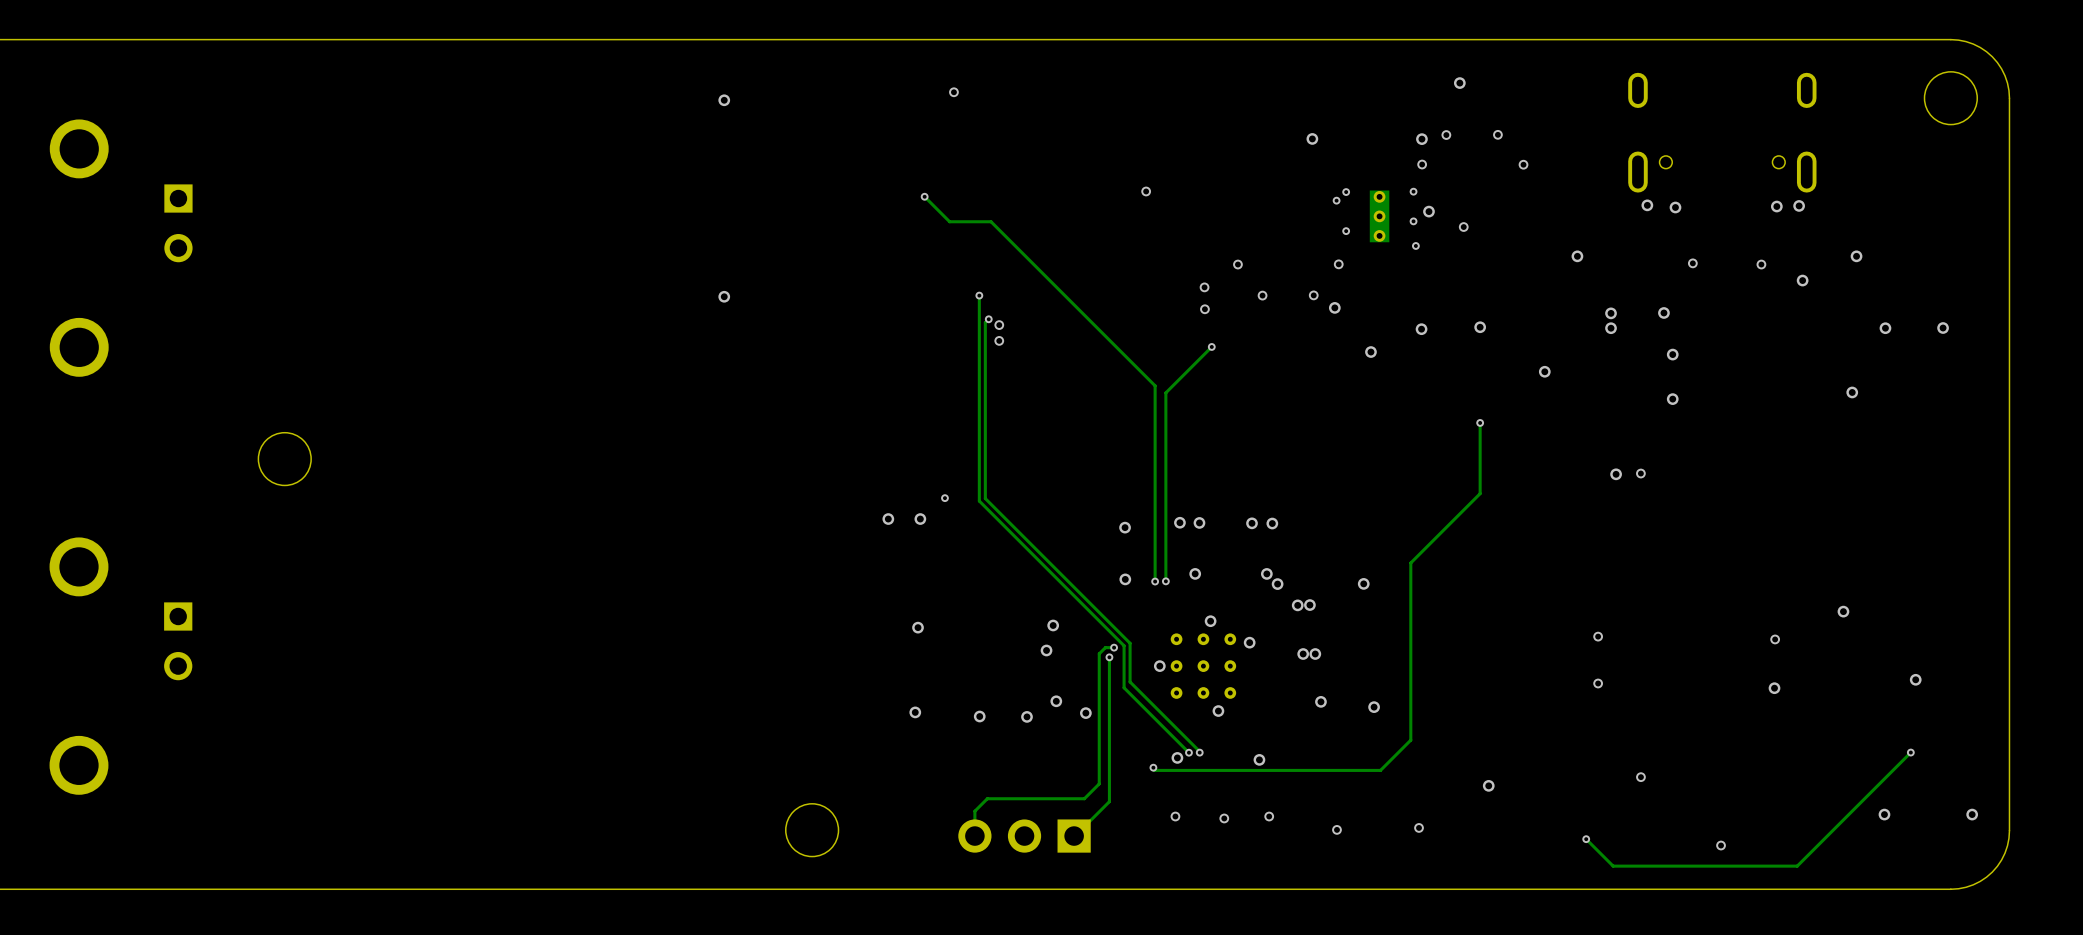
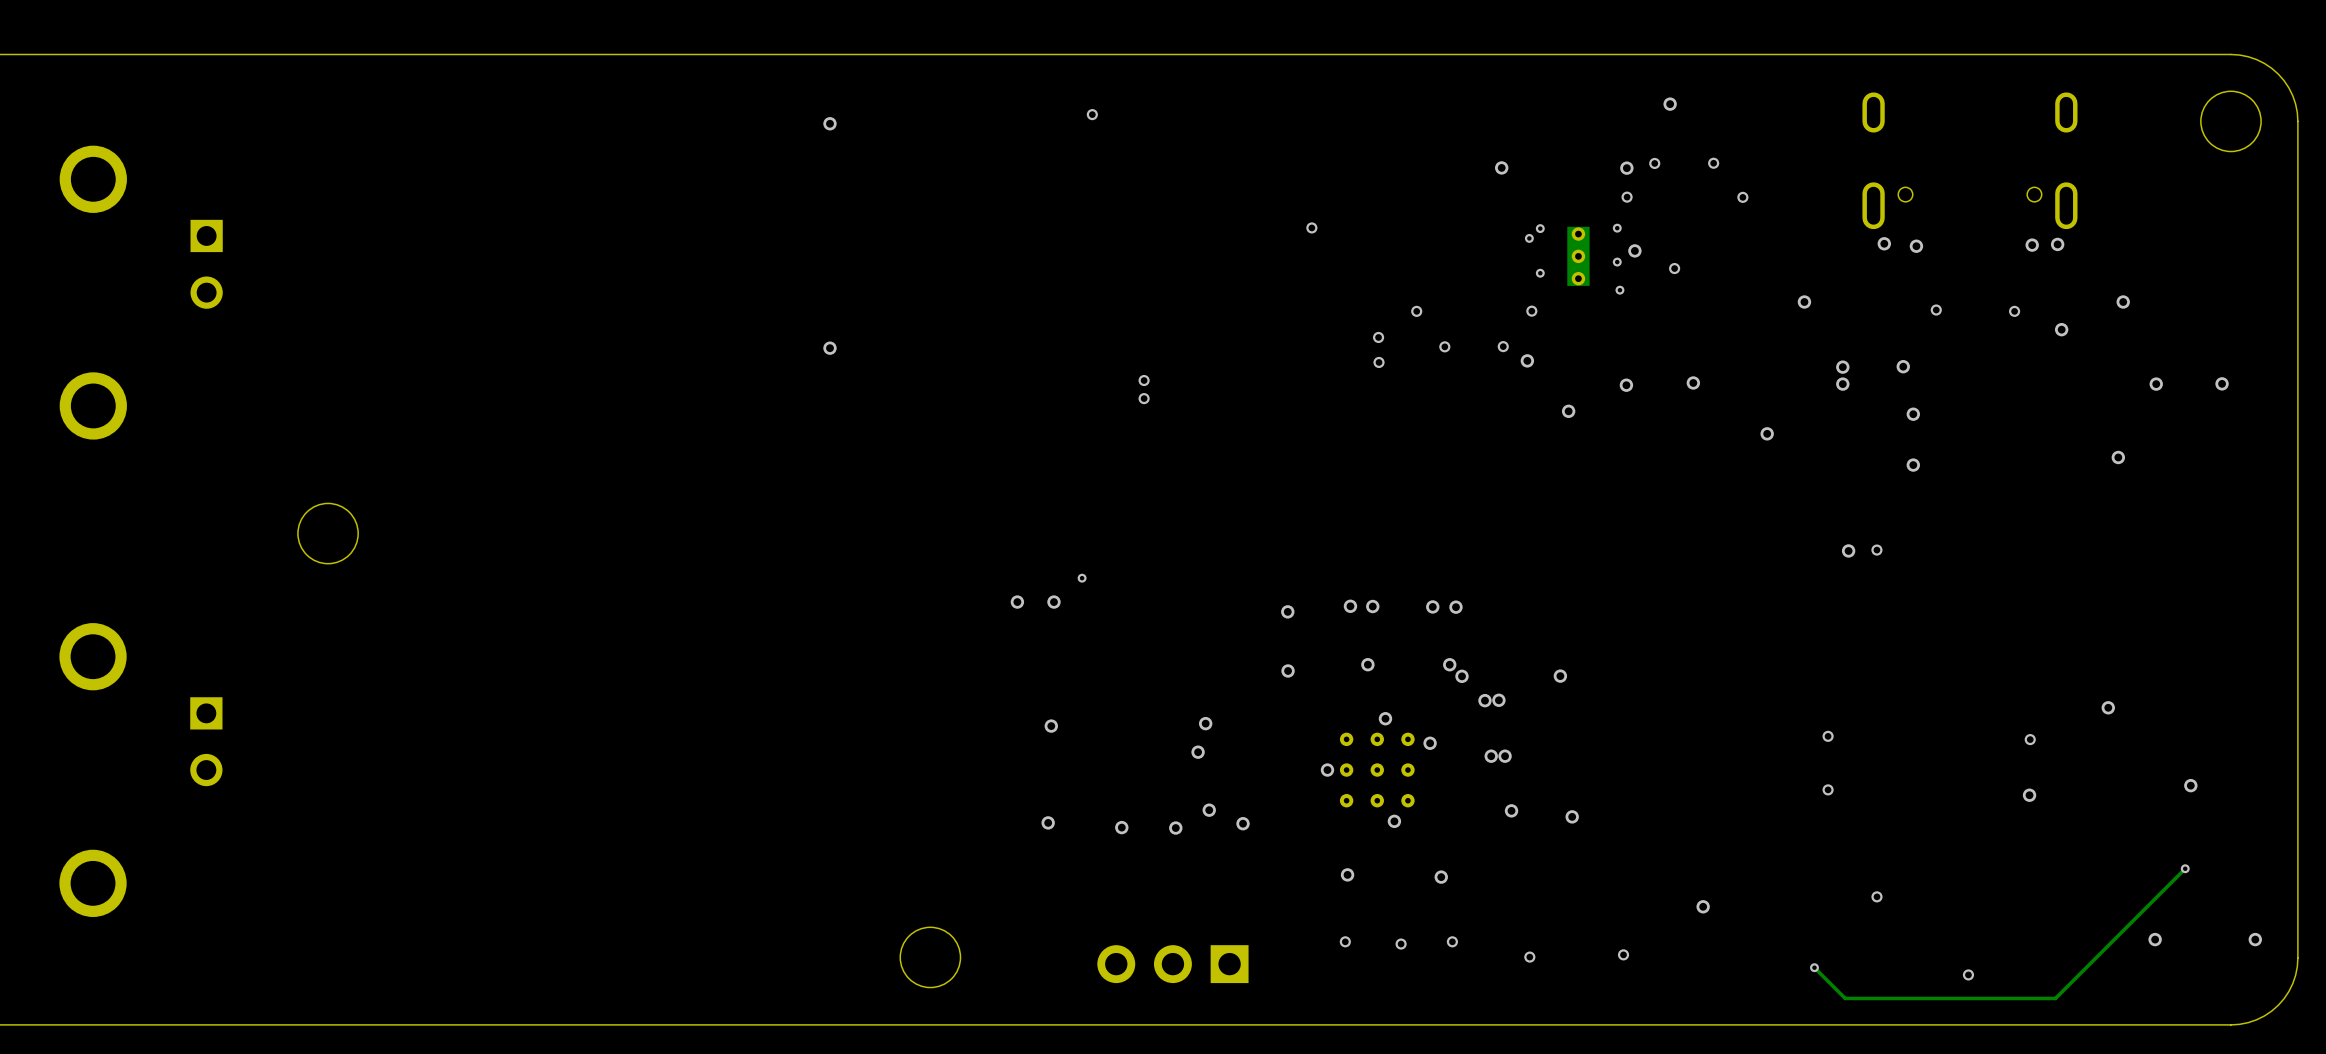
track: (924, 196) (949, 221) (991, 221) (1155, 385) (1155, 581) -> none
via: (924, 196) -> none
track: (979, 295) (979, 501) (1124, 645) (1124, 687) (1188, 752) -> none
via: (979, 295) -> none
track: (988, 319) (985, 322) (985, 498) (1130, 643) (1130, 681) (1199, 752) -> none
via: (988, 319) -> none
track: (1211, 346) (1165, 392) (1165, 581) -> none
via: (1211, 346) -> none
track: (1480, 422) (1480, 493) (1410, 562) (1410, 740) (1380, 770) (1154, 770) (1153, 767) -> none
via: (1480, 422) -> none
via: (1155, 581) -> none
via: (1165, 581) -> none
track: (1114, 647) (1105, 647) (1099, 653) (1099, 783) (1084, 798) (987, 798) (974, 811) (974, 836) -> none
via: (1114, 647) -> none
track: (1109, 657) (1109, 801) (1074, 836) -> none
via: (1109, 657) -> none
via: (1188, 752) -> none
via: (1199, 752) -> none
via: (1153, 767) -> none

